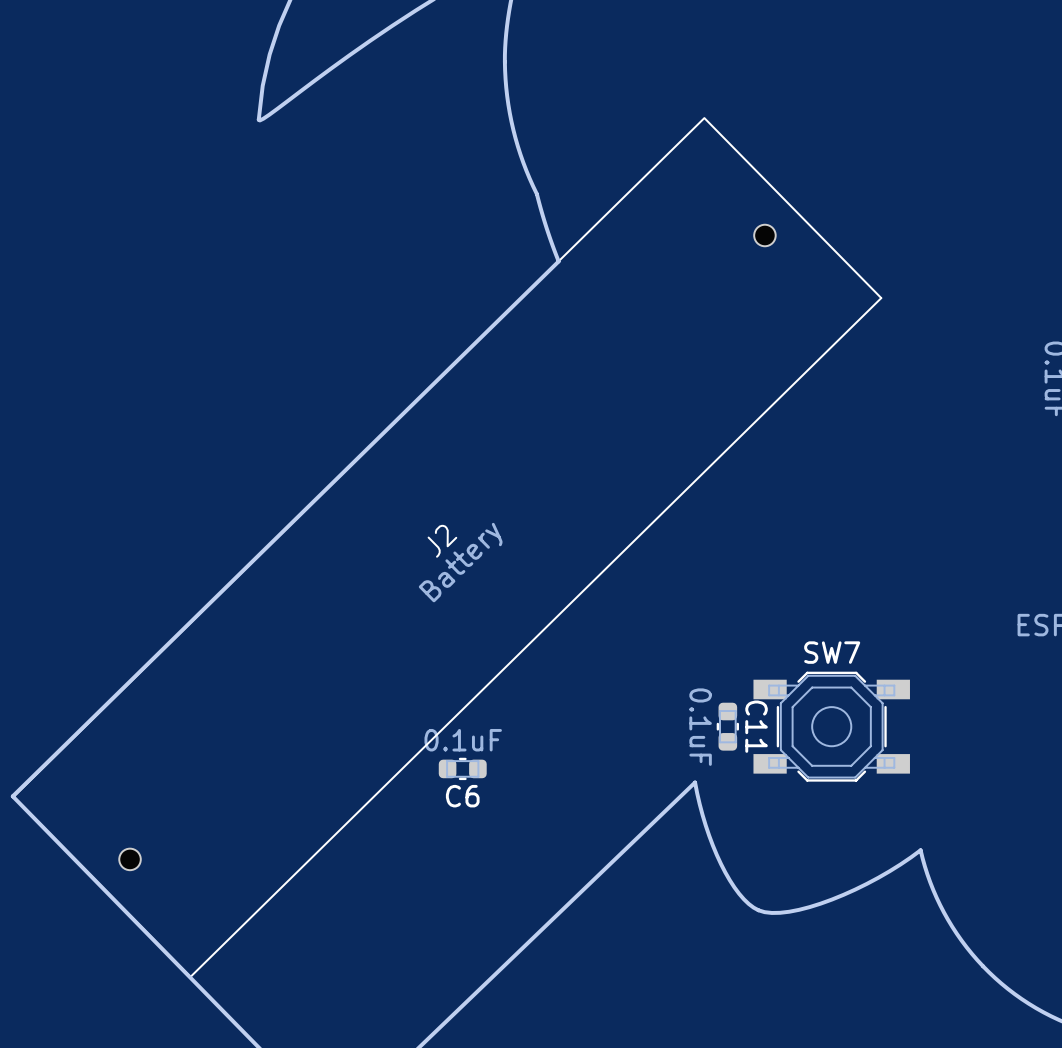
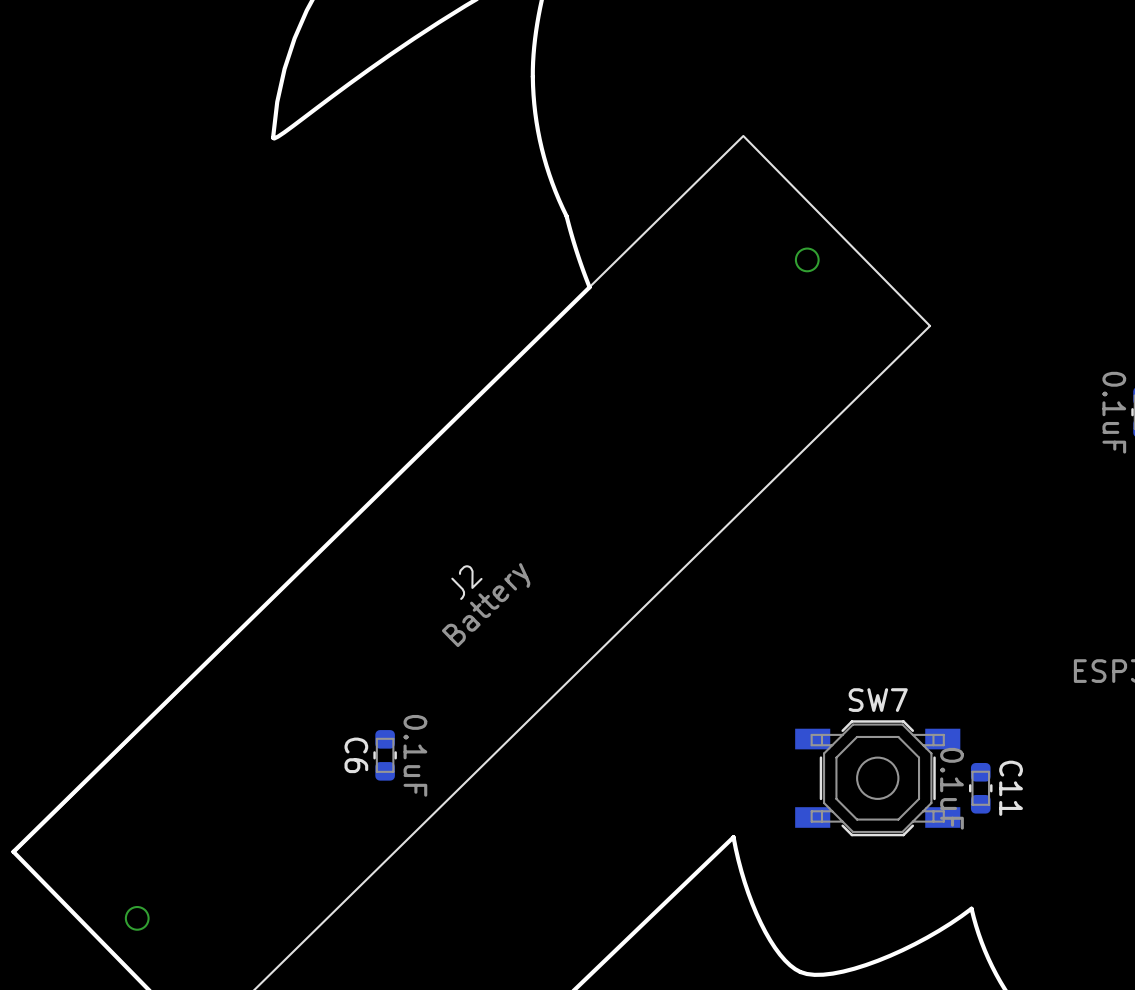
C11 position: (727, 726) -> (980, 788)
C6 rotation: 0° (462, 768) -> 90° clockwise (385, 755)
C6 position: (462, 768) -> (385, 755)

